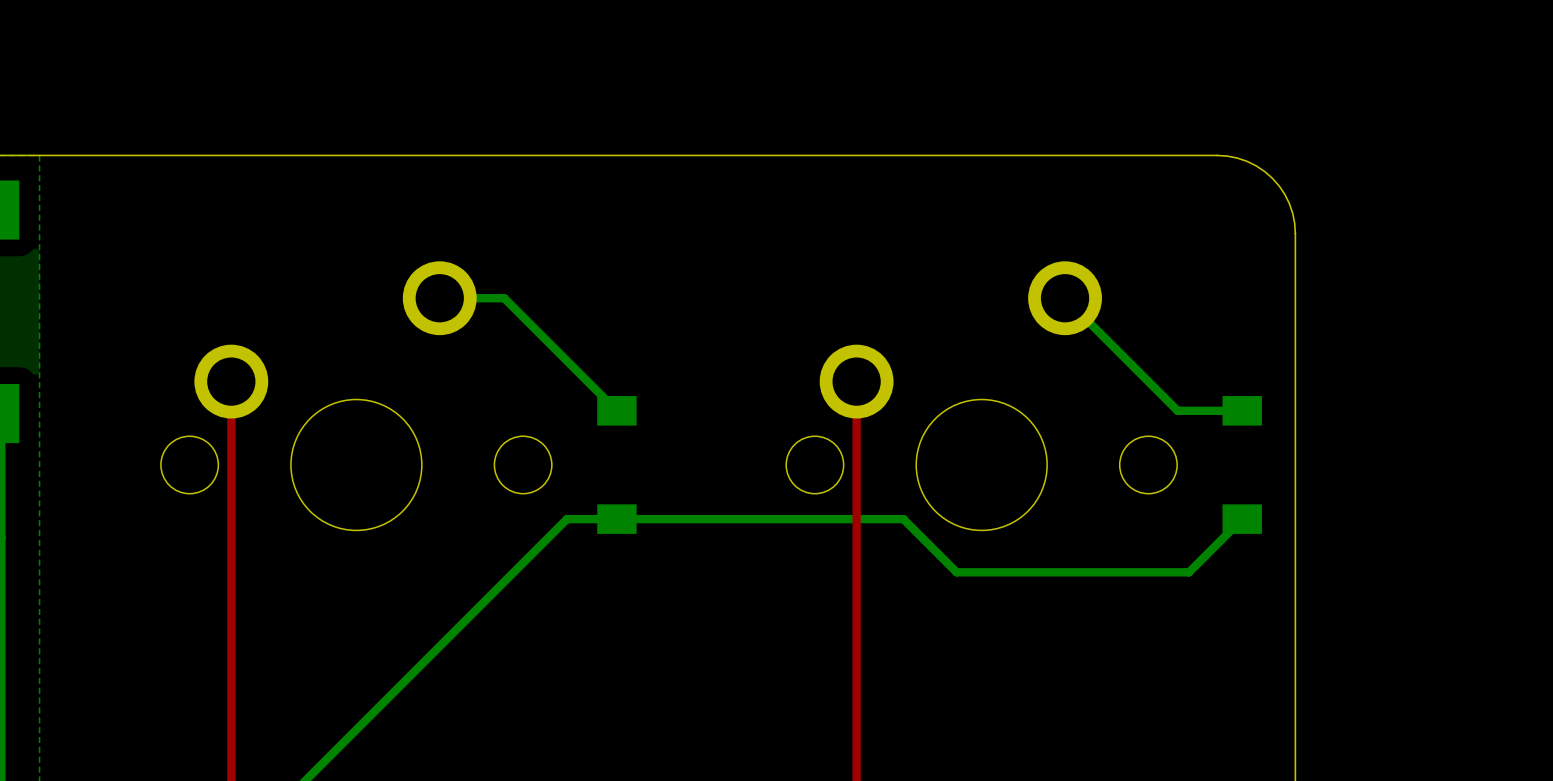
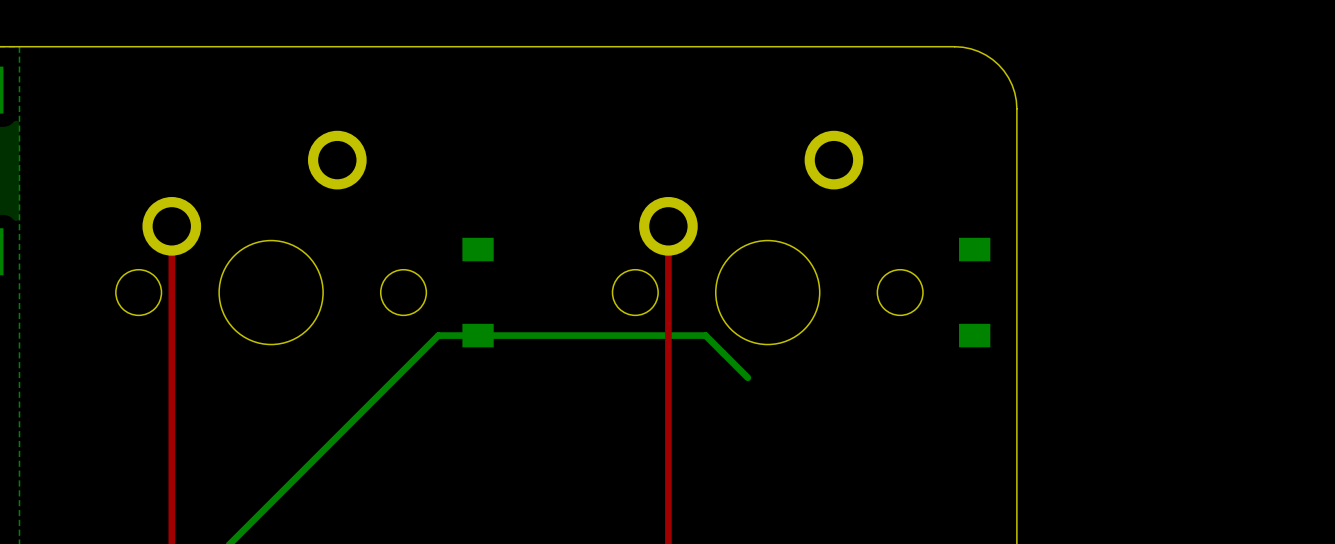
bottom track: (439, 298) (504, 298) (616, 410) -> none
bottom track: (1065, 298) (1177, 410) (1242, 410) -> none
bottom track: (1242, 519) (1189, 572) (956, 572) -> none

